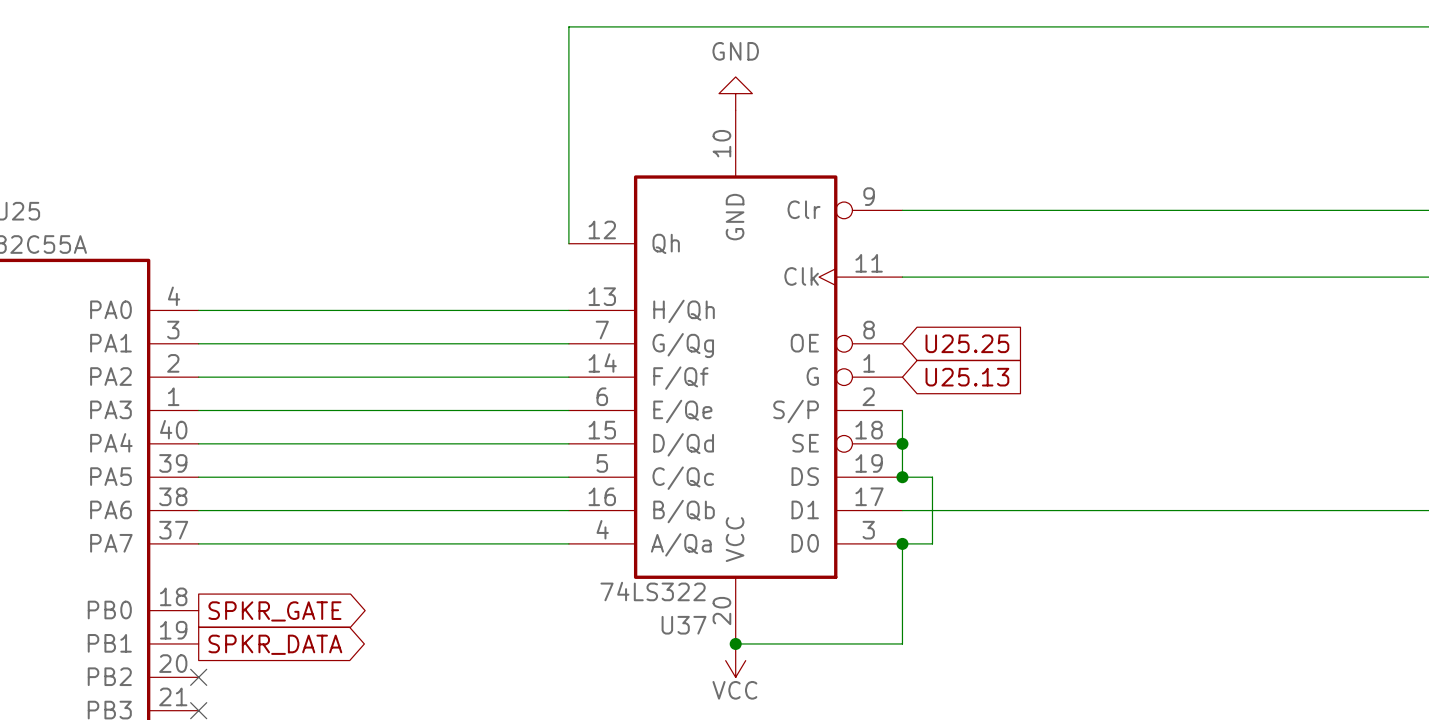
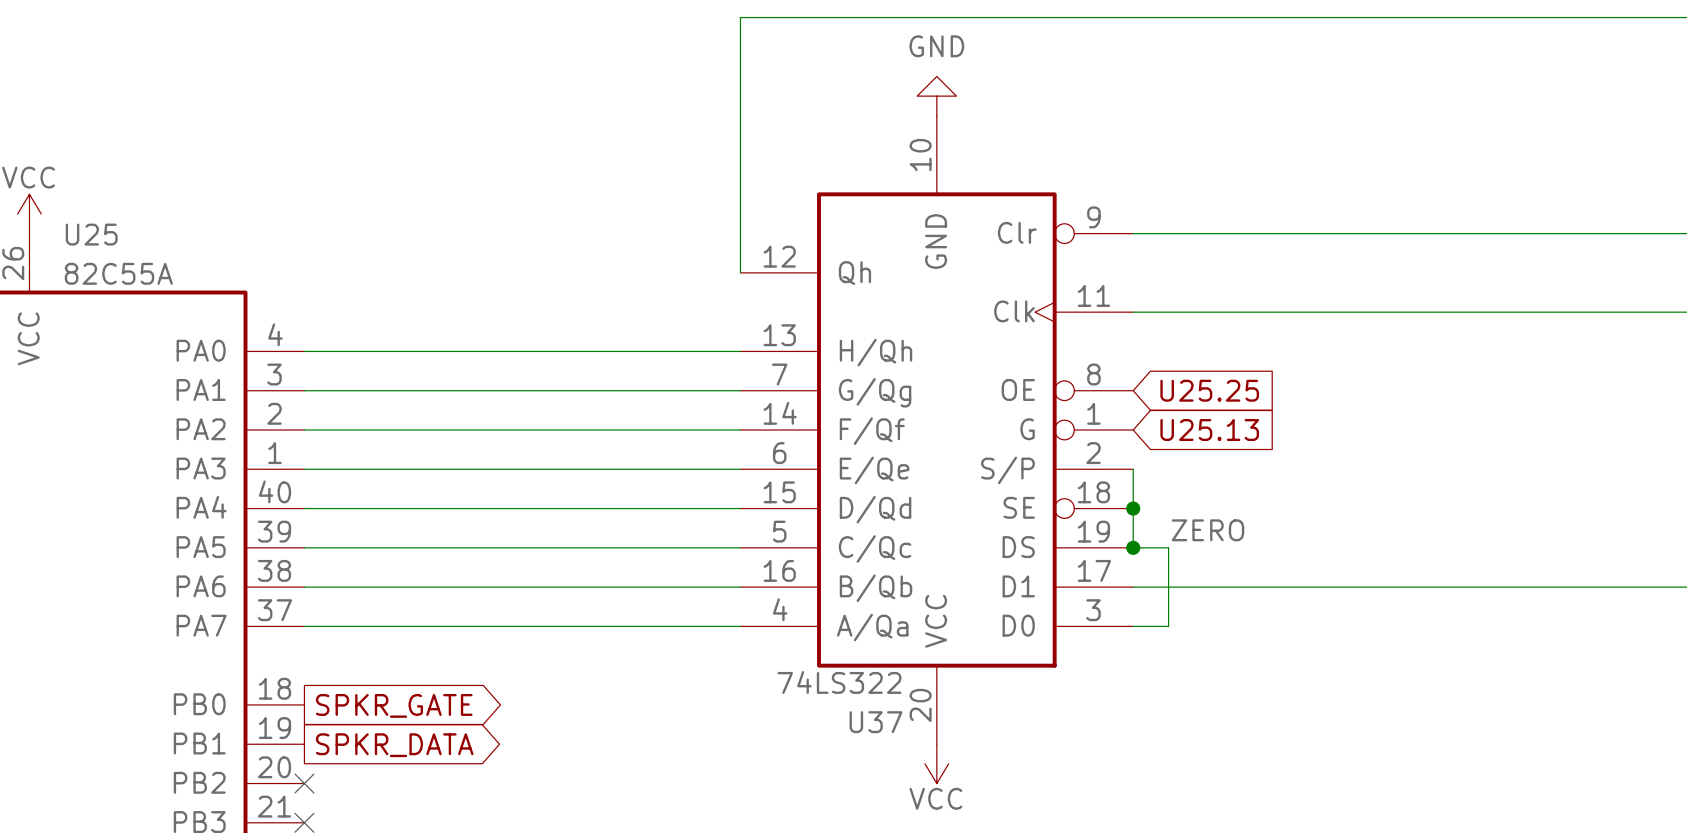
label: none -> ZERO (1208, 530)
wire: (902, 543) (902, 643) (735, 643) -> none
junction: (902, 543) -> none
junction: (735, 643) -> none

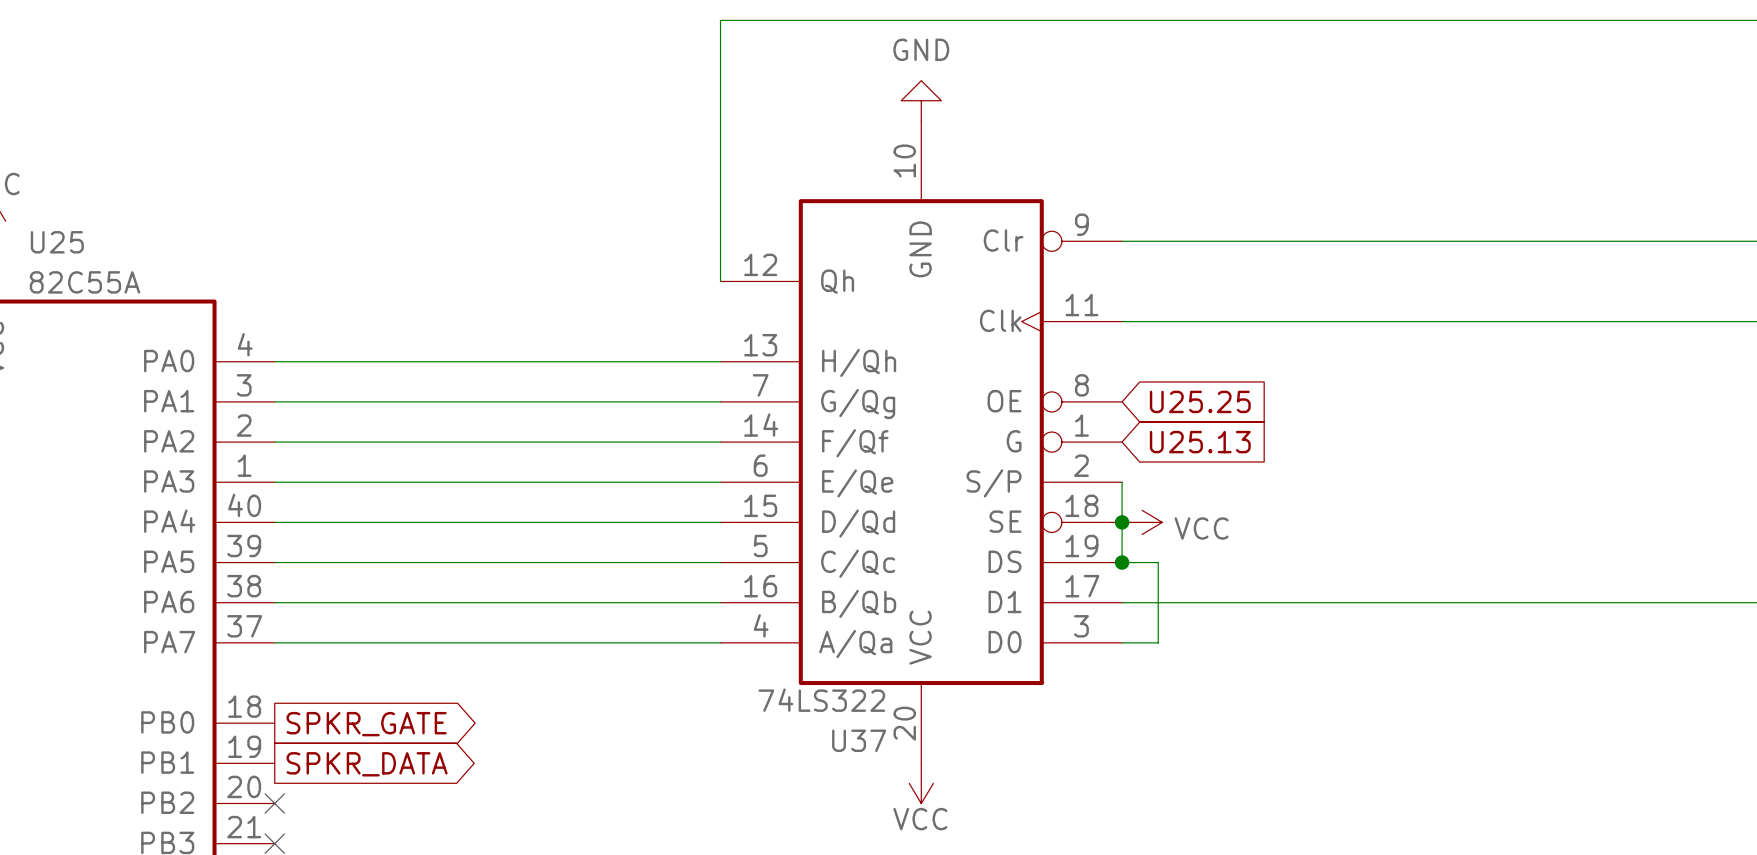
power symbol: none -> VCC (1142, 522)
label: ZERO (1208, 530) -> none

